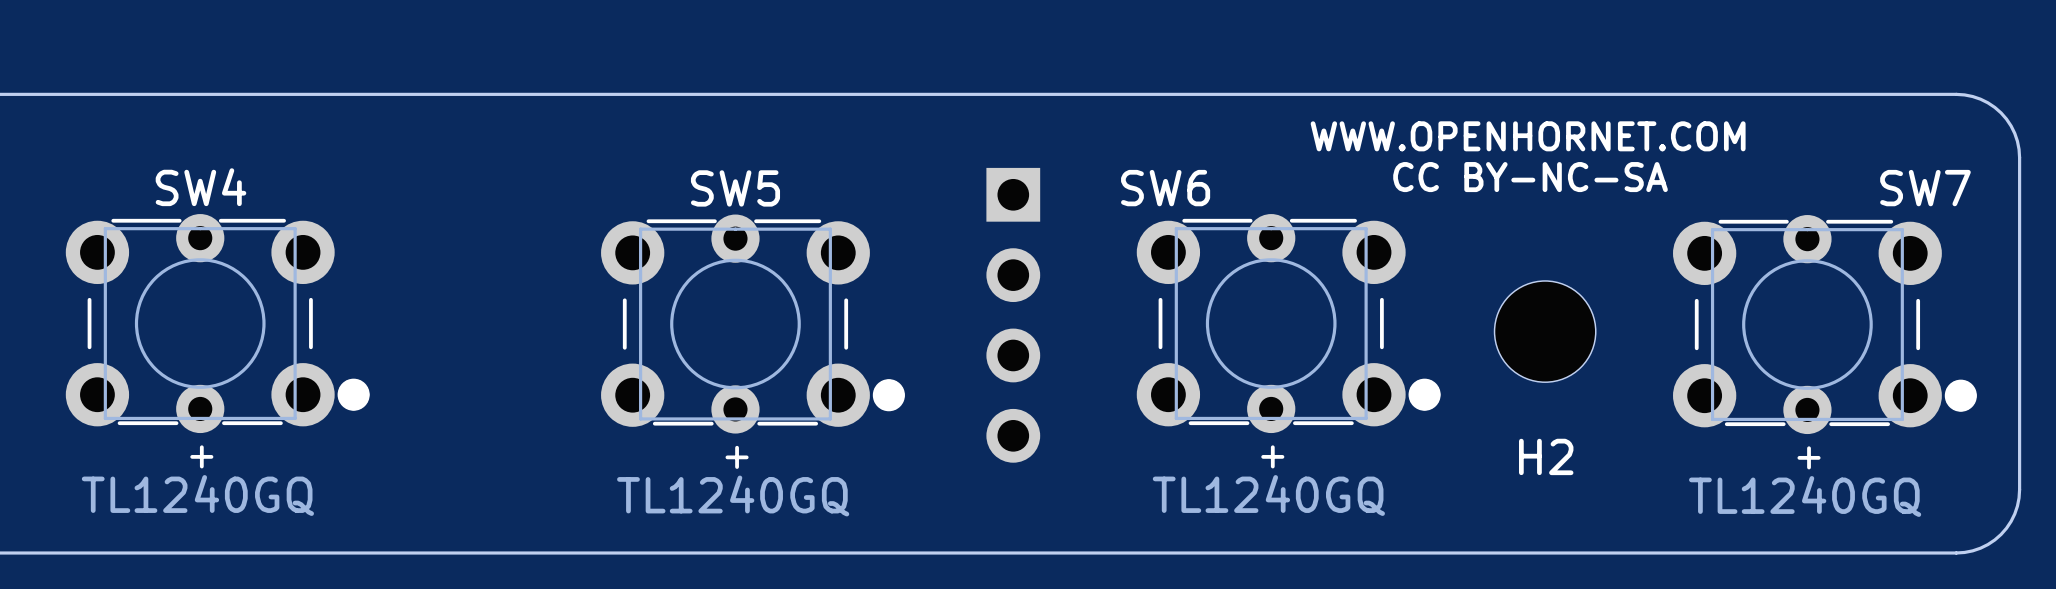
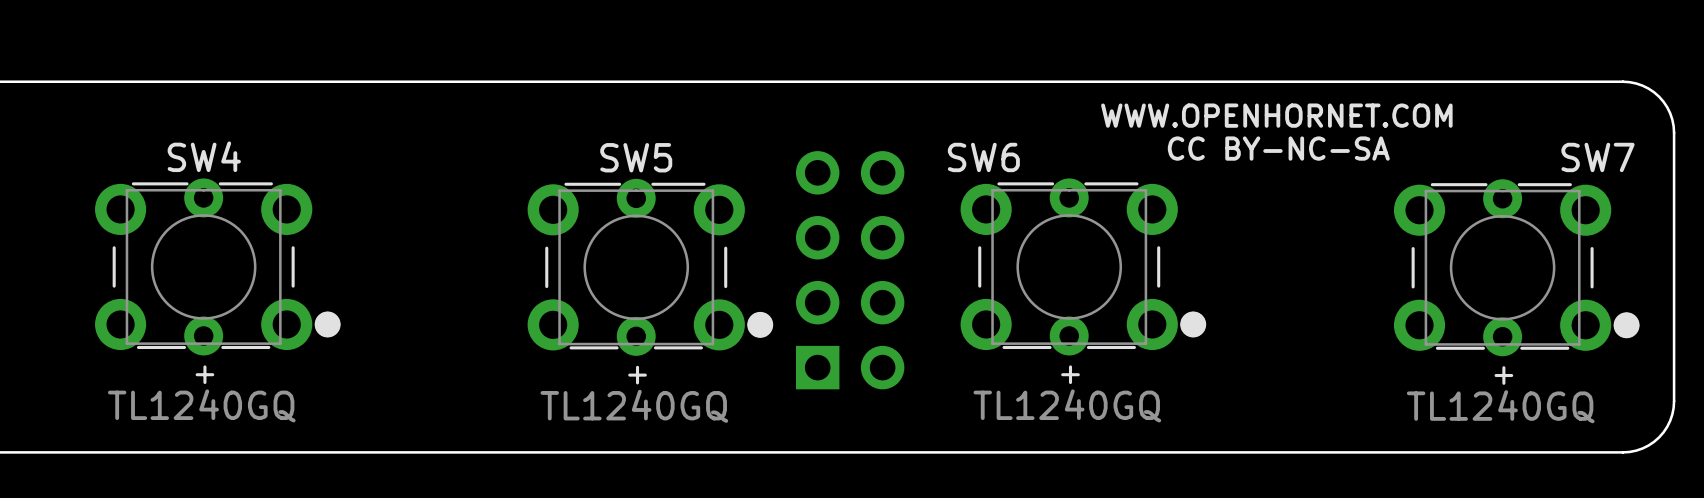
part footprint: [986, 167, 1041, 463] -> [795, 151, 905, 390]
H2: (1545, 331) -> none

